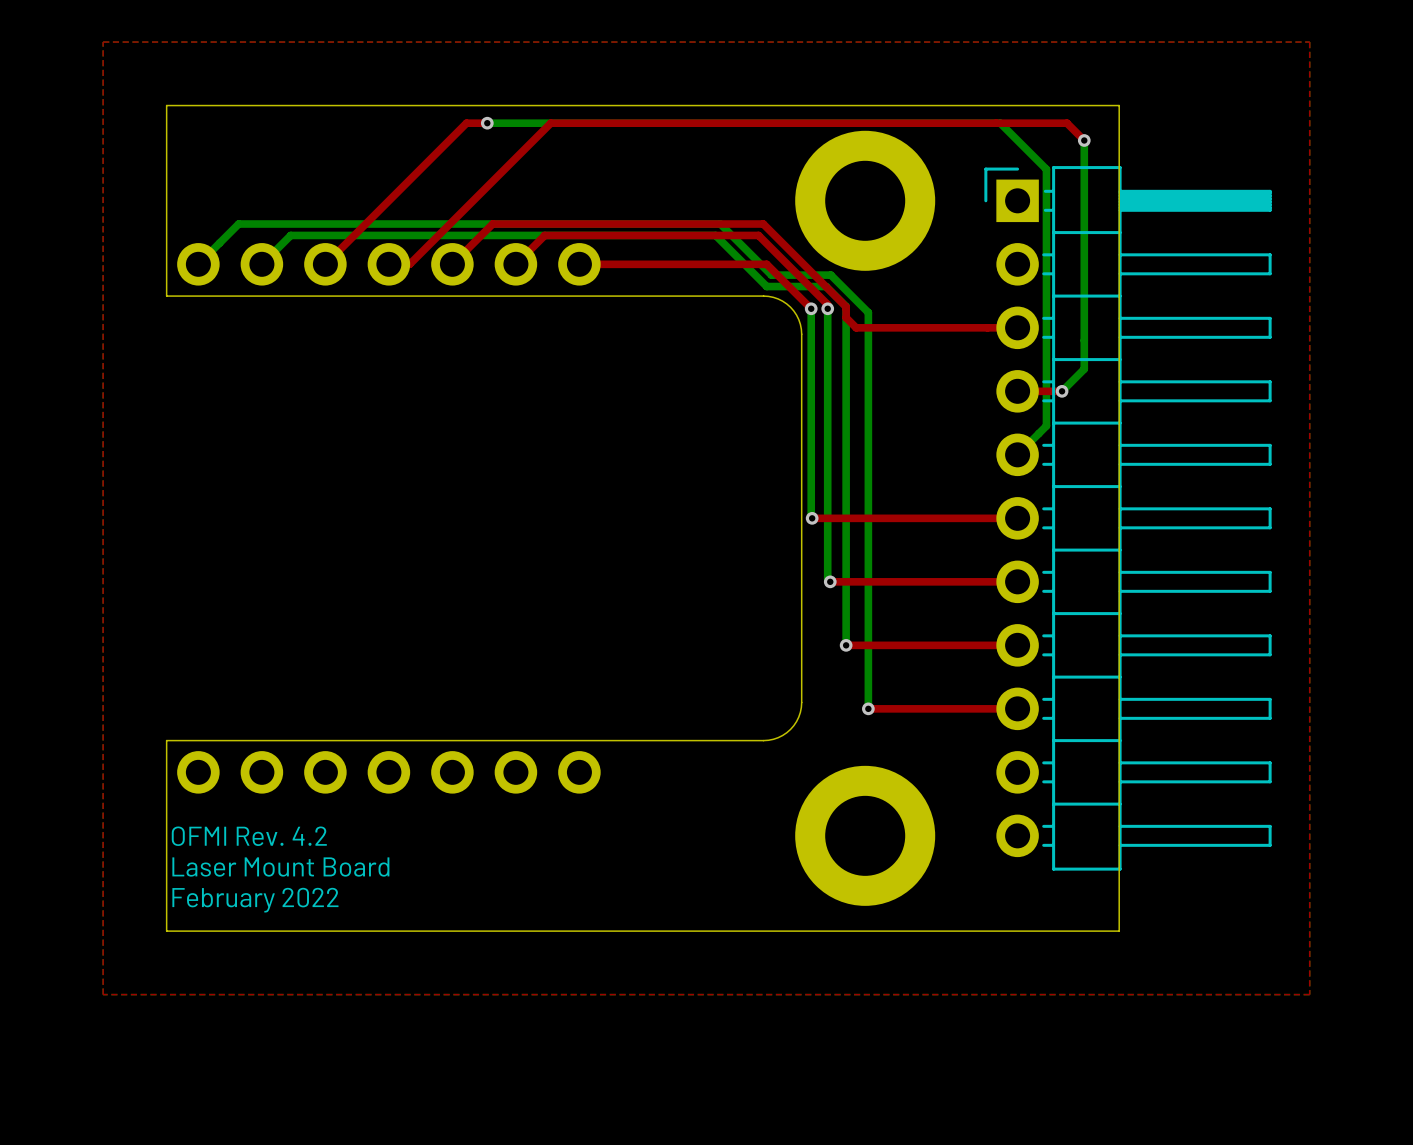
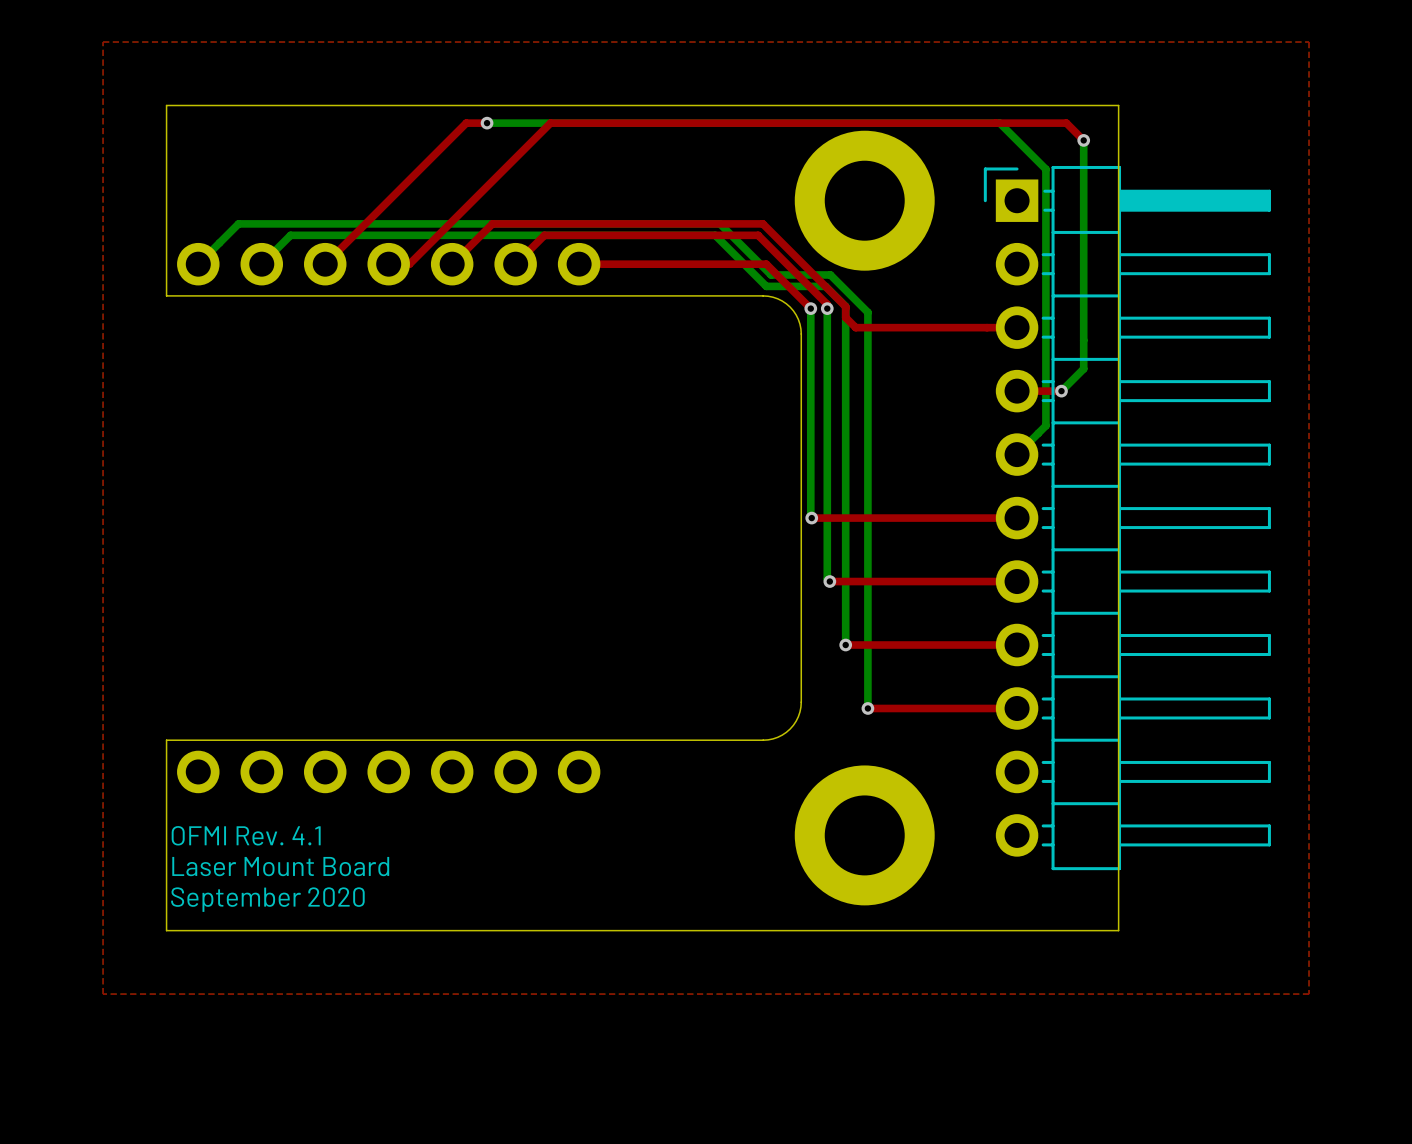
text: OFMI Rev. 4.2 (249, 836) -> OFMI Rev. 4.1 (246, 835)
text: February 2022 (255, 900) -> September 2020 (267, 899)

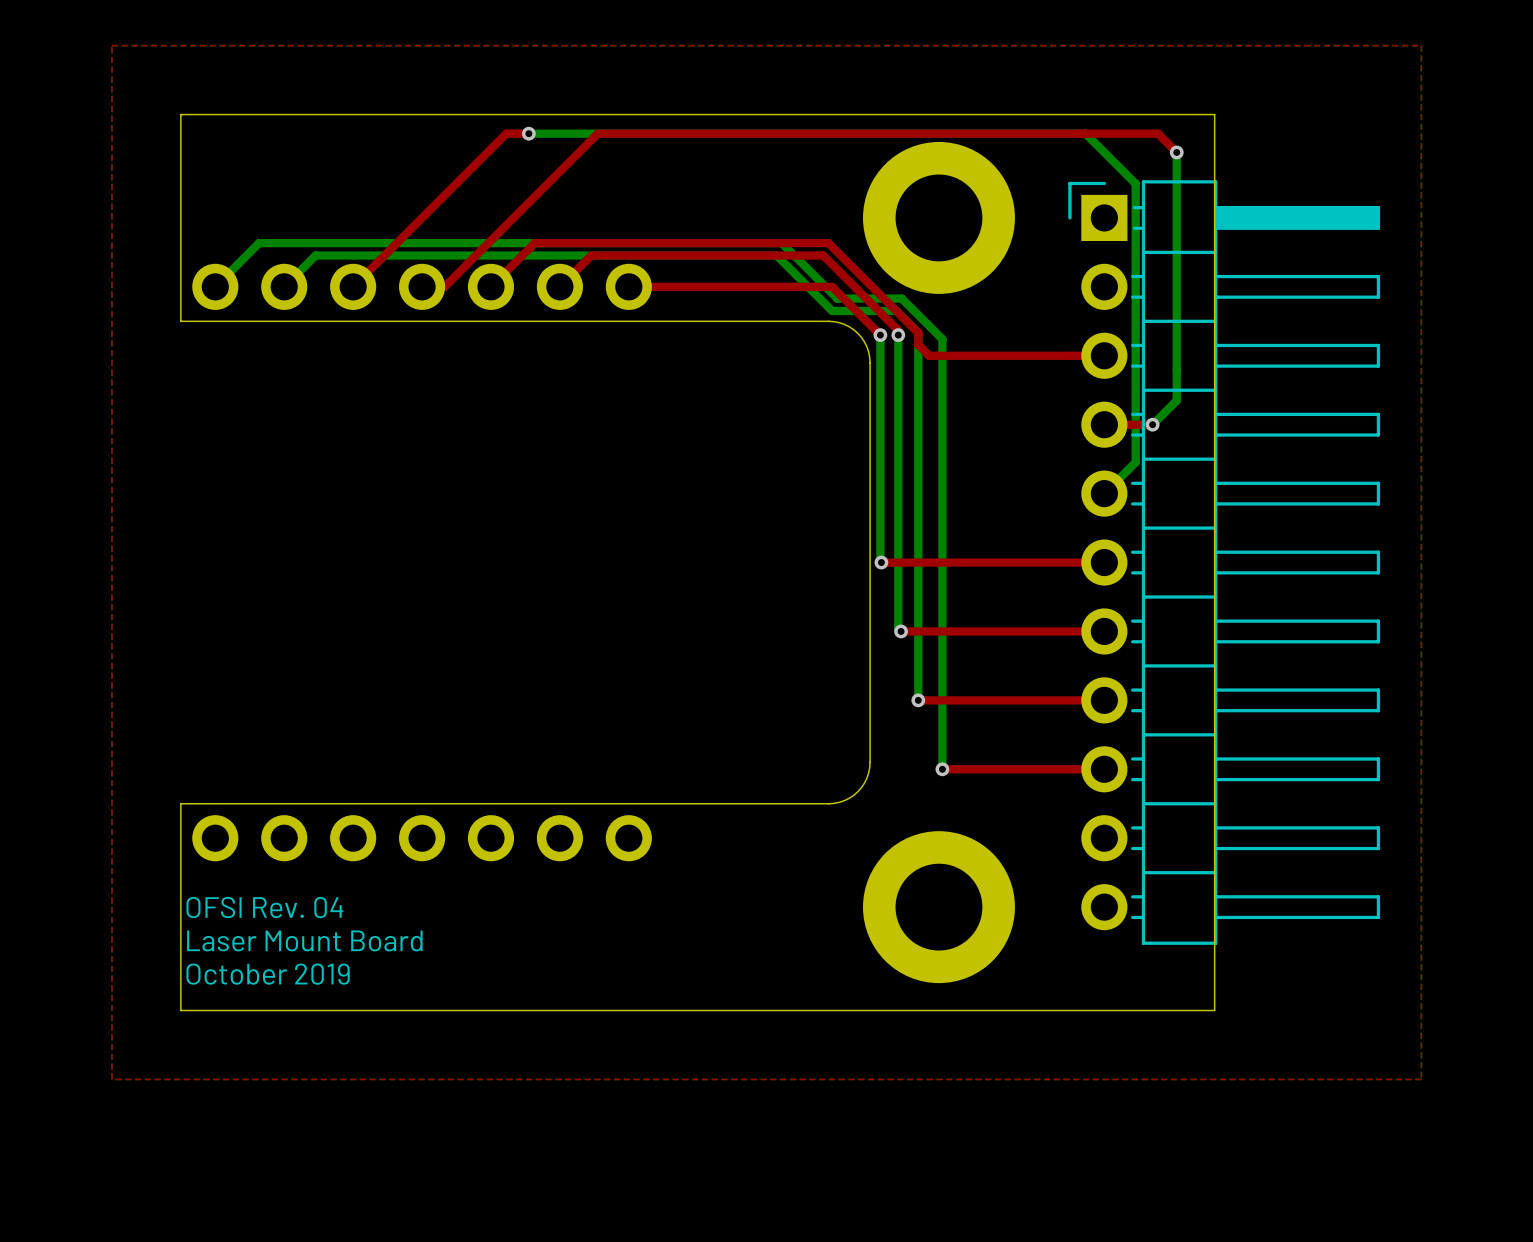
text: OFMI Rev. 4.1 (246, 835) -> OFSI Rev. 04 (264, 907)
text: September 2020 (267, 899) -> October 2019 (268, 974)

